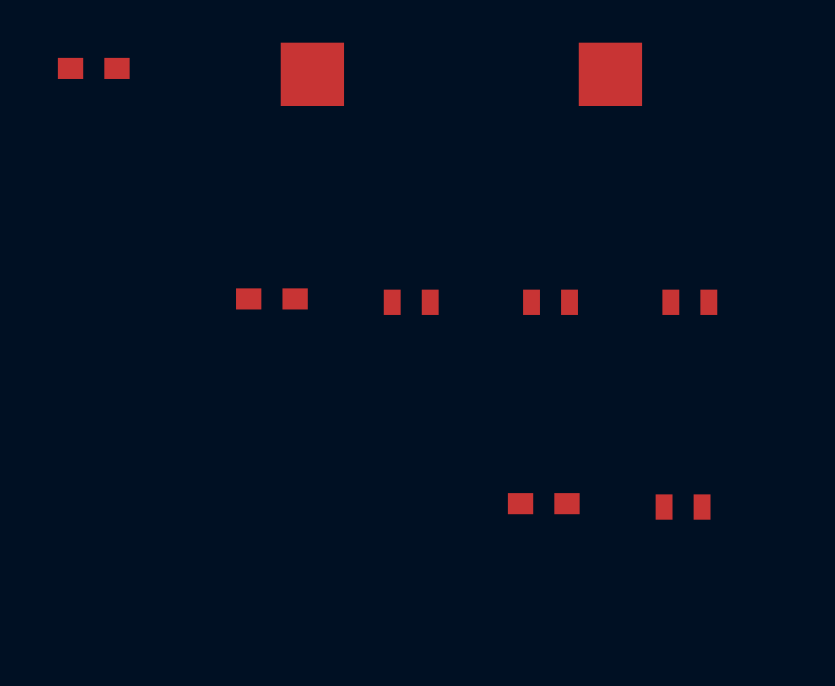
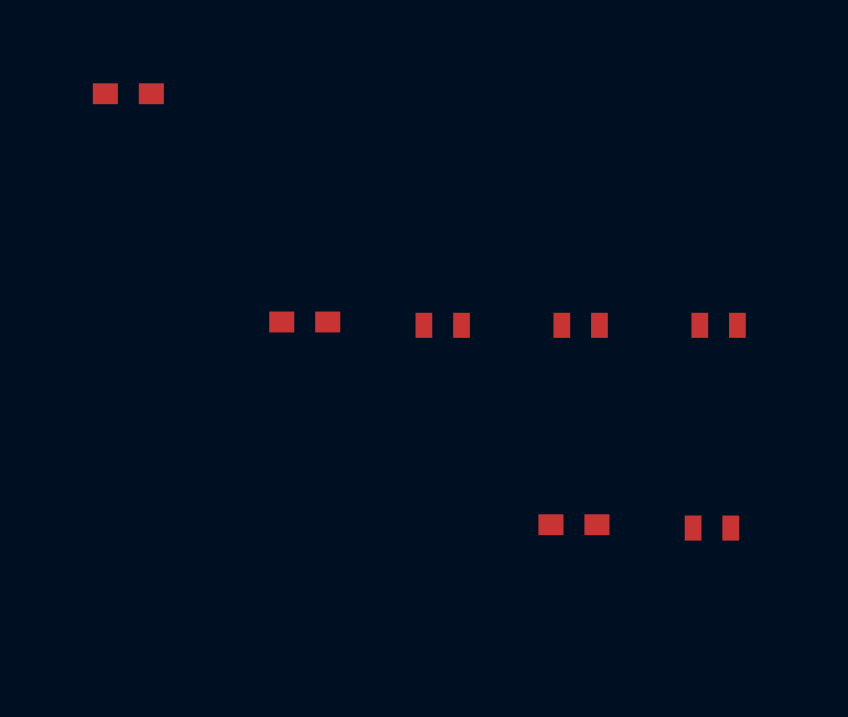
part: (312, 74) -> none
part: (610, 74) -> none

